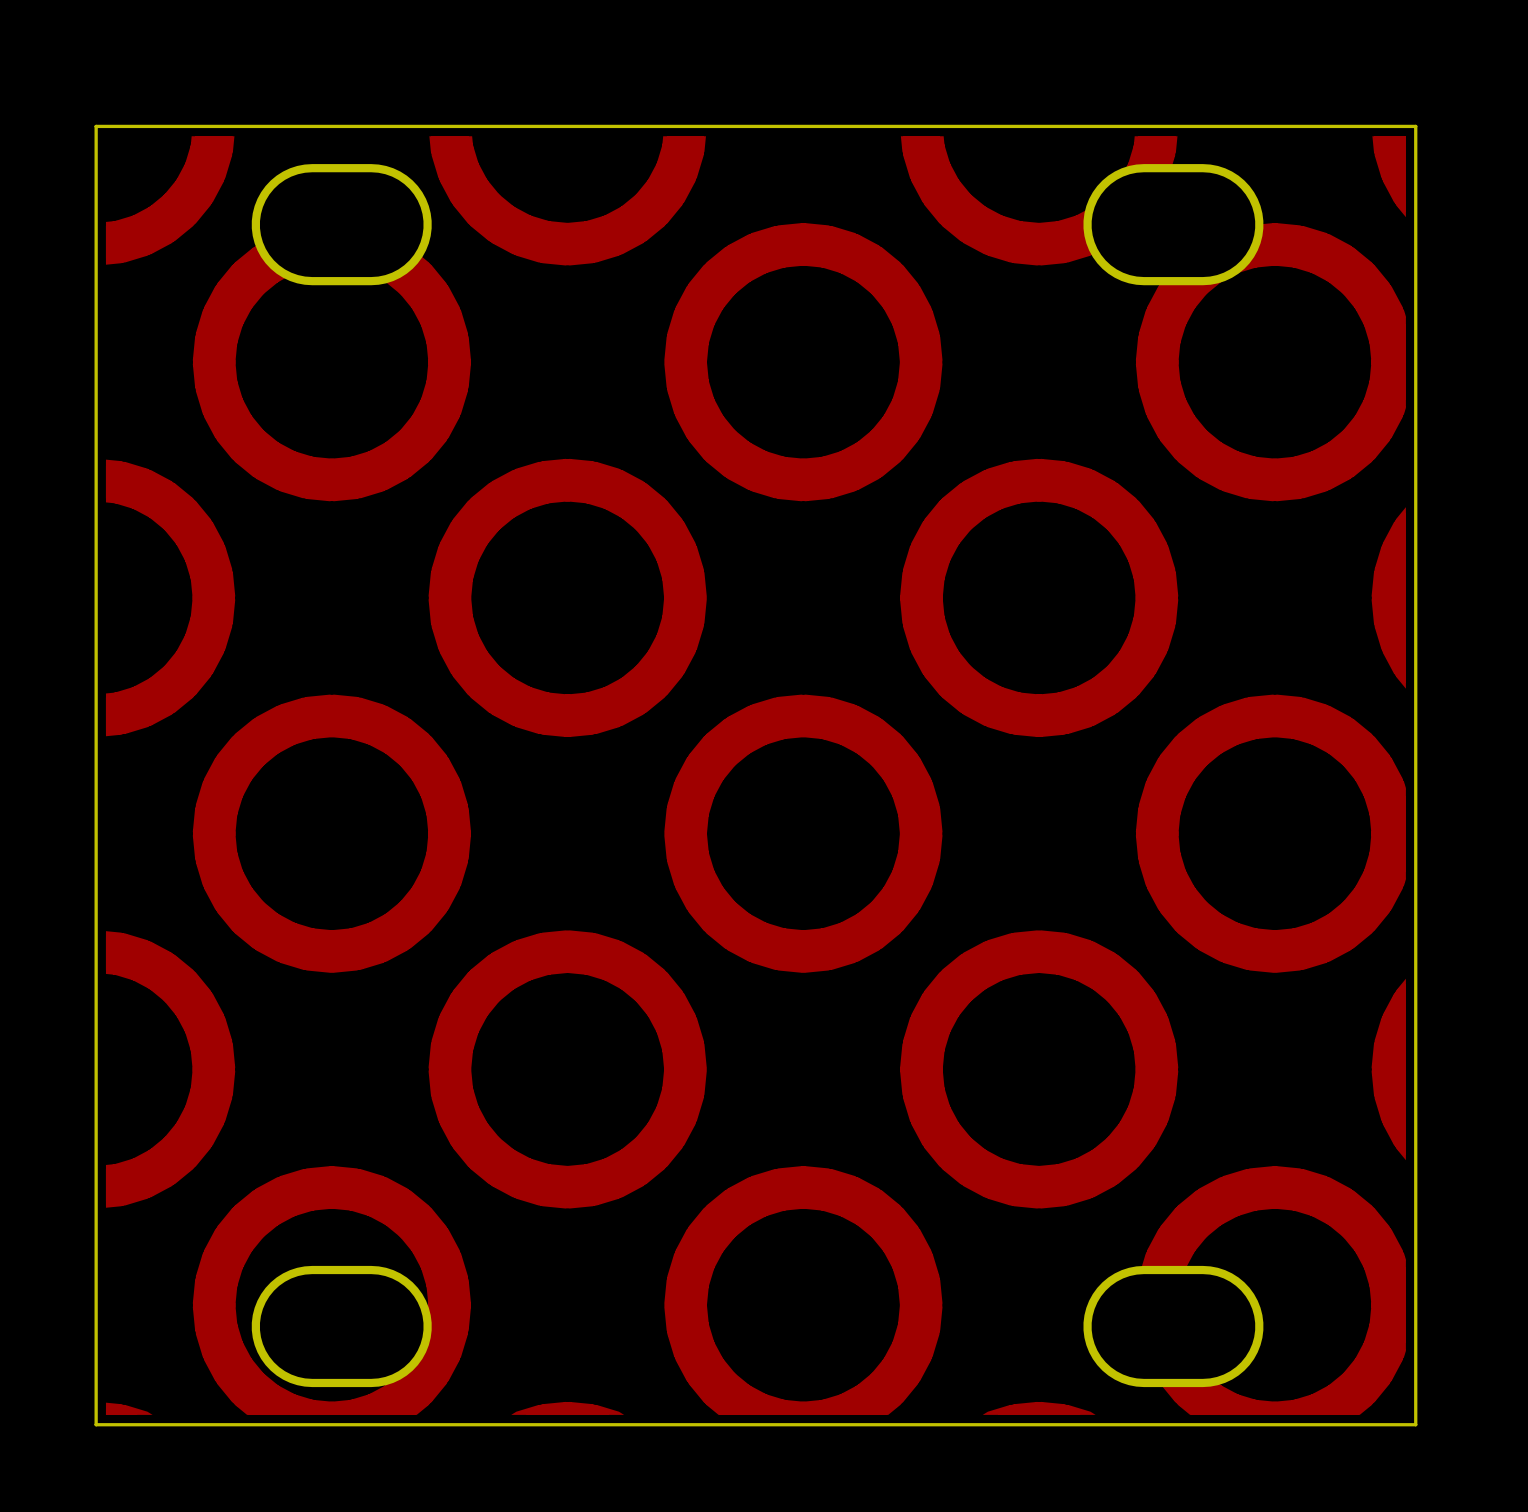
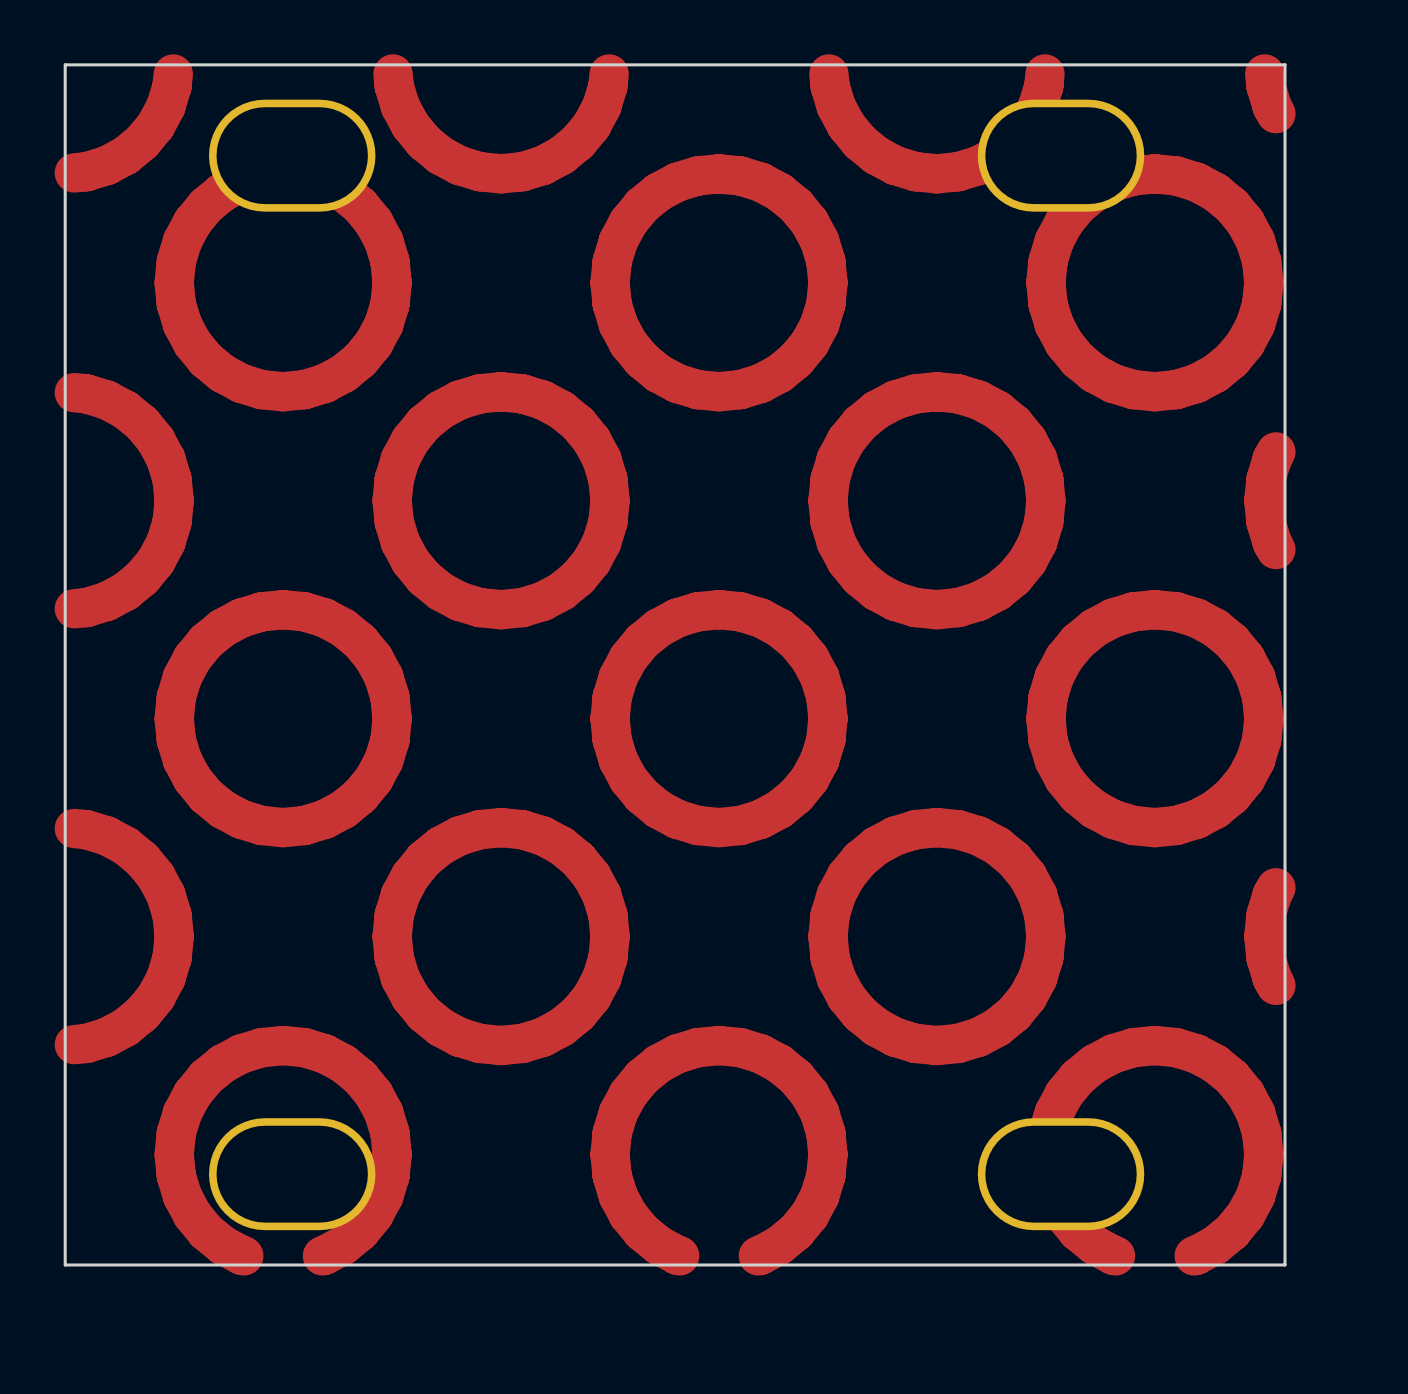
drawing: [105, 136, 1406, 1415] -> none
track: none -> (173, 73) (172, 86) (165, 106) (155, 125) (142, 141) (125, 155) (106, 165) (86, 171) (74, 172)
track: none -> (393, 73) (394, 86) (400, 106) (410, 125) (424, 141) (440, 155) (459, 165) (479, 171) (501, 173) (522, 171) (542, 165) (561, 155) (578, 141) (591, 125) (601, 106) (607, 86) (609, 73)
track: none -> (828, 73) (830, 86) (836, 106) (846, 125) (859, 141) (876, 155) (895, 165) (915, 171) (936, 173) (958, 171) (978, 165) (997, 155) (1013, 141) (1027, 125) (1037, 106) (1043, 86) (1045, 73)
track: none -> (1264, 73) (1265, 86) (1275, 113)
track: none -> (283, 173) (261, 175) (241, 182) (222, 192) (206, 205) (192, 222) (182, 241) (176, 261) (174, 282) (176, 304) (182, 324) (192, 343) (206, 359) (222, 373) (241, 383) (261, 389) (283, 391) (304, 389) (324, 383) (343, 373) (360, 359) (373, 343) (383, 324) (390, 304) (392, 282) (390, 261) (383, 241) (373, 222) (360, 205) (343, 192) (324, 182) (304, 175) (283, 173)
track: none -> (719, 173) (697, 175) (677, 182) (658, 192) (641, 205) (628, 222) (618, 241) (612, 261) (610, 282) (612, 304) (618, 324) (628, 343) (641, 359) (658, 373) (677, 383) (697, 389) (719, 391) (740, 389) (760, 383) (779, 373) (796, 359) (809, 343) (819, 324) (825, 304) (827, 282) (825, 261) (819, 241) (809, 222) (796, 205) (779, 192) (760, 182) (740, 175) (719, 173)
track: none -> (1154, 173) (1133, 175) (1113, 182) (1094, 192) (1077, 205) (1064, 222) (1054, 241) (1047, 261) (1045, 282) (1047, 304) (1054, 324) (1064, 343) (1077, 359) (1094, 373) (1113, 383) (1133, 389) (1154, 391) (1176, 389) (1196, 383) (1215, 373) (1231, 359) (1245, 343) (1255, 324) (1261, 304) (1263, 282) (1261, 261) (1255, 241) (1245, 222) (1231, 205) (1215, 192) (1196, 182) (1176, 175) (1154, 173)
track: none -> (501, 391) (479, 393) (459, 400) (440, 410) (424, 423) (410, 440) (400, 459) (394, 479) (392, 500) (394, 521) (400, 542) (410, 561) (424, 577) (440, 591) (459, 601) (479, 607) (501, 609) (522, 607) (542, 601) (561, 591) (578, 577) (591, 561) (601, 542) (607, 521) (610, 500) (607, 479) (601, 459) (591, 440) (578, 423) (561, 410) (542, 400) (522, 393) (501, 391)
track: none -> (936, 391) (915, 393) (895, 400) (876, 410) (859, 423) (846, 440) (836, 459) (830, 479) (827, 500) (830, 521) (836, 542) (846, 561) (859, 577) (876, 591) (895, 601) (915, 607) (936, 609) (958, 607) (978, 601) (997, 591) (1013, 577) (1027, 561) (1037, 542) (1043, 521) (1045, 500) (1043, 479) (1037, 459) (1027, 440) (1013, 423) (997, 410) (978, 400) (958, 393) (936, 391)
track: none -> (74, 392) (86, 393) (106, 400) (125, 410) (142, 423) (155, 440) (165, 459) (172, 479) (174, 500) (172, 521) (165, 542) (155, 561) (142, 577) (125, 591) (106, 601) (86, 607) (74, 608)
track: none -> (1275, 451) (1265, 479) (1263, 500) (1265, 521) (1275, 549)
track: none -> (283, 609) (261, 611) (241, 617) (222, 628) (206, 641) (192, 658) (182, 676) (176, 697) (174, 718) (176, 739) (182, 760) (192, 779) (206, 795) (222, 809) (241, 819) (261, 825) (283, 827) (304, 825) (324, 819) (343, 809) (360, 795) (373, 779) (383, 760) (390, 739) (392, 718) (390, 697) (383, 676) (373, 658) (360, 641) (343, 628) (324, 617) (304, 611) (283, 609)
track: none -> (719, 609) (697, 611) (677, 617) (658, 628) (641, 641) (628, 658) (618, 676) (612, 697) (610, 718) (612, 739) (618, 760) (628, 779) (641, 795) (658, 809) (677, 819) (697, 825) (719, 827) (740, 825) (760, 819) (779, 809) (796, 795) (809, 779) (819, 760) (825, 739) (827, 718) (825, 697) (819, 676) (809, 658) (796, 641) (779, 628) (760, 617) (740, 611) (719, 609)
track: none -> (1154, 609) (1133, 611) (1113, 617) (1094, 628) (1077, 641) (1064, 658) (1054, 676) (1047, 697) (1045, 718) (1047, 739) (1054, 760) (1064, 779) (1077, 795) (1094, 809) (1113, 819) (1133, 825) (1154, 827) (1176, 825) (1196, 819) (1215, 809) (1231, 795) (1245, 779) (1255, 760) (1261, 739) (1263, 718) (1261, 697) (1255, 676) (1245, 658) (1231, 641) (1215, 628) (1196, 617) (1176, 611) (1154, 609)
track: none -> (501, 827) (479, 829) (459, 835) (440, 845) (424, 859) (410, 876) (400, 894) (394, 915) (392, 936) (394, 957) (400, 978) (410, 997) (424, 1013) (440, 1027) (459, 1037) (479, 1043) (501, 1045) (522, 1043) (542, 1037) (561, 1027) (578, 1013) (591, 997) (601, 978) (607, 957) (610, 936) (607, 915) (601, 894) (591, 876) (578, 859) (561, 845) (542, 835) (522, 829) (501, 827)
track: none -> (936, 827) (915, 829) (895, 835) (876, 845) (859, 859) (846, 876) (836, 894) (830, 915) (827, 936) (830, 957) (836, 978) (846, 997) (859, 1013) (876, 1027) (895, 1037) (915, 1043) (936, 1045) (958, 1043) (978, 1037) (997, 1027) (1013, 1013) (1027, 997) (1037, 978) (1043, 957) (1045, 936) (1043, 915) (1037, 894) (1027, 876) (1013, 859) (997, 845) (978, 835) (958, 829) (936, 827)
track: none -> (74, 828) (86, 829) (106, 835) (125, 845) (142, 859) (155, 876) (165, 894) (172, 915) (174, 936) (172, 957) (165, 978) (155, 997) (142, 1013) (125, 1027) (106, 1037) (86, 1043) (74, 1044)
track: none -> (1275, 887) (1265, 915) (1263, 936) (1265, 957) (1275, 985)
drawing: [511, 1401, 625, 1415] -> none
drawing: [982, 1401, 1096, 1415] -> none
drawing: [105, 1402, 153, 1415] -> none
track: none -> (243, 1255) (222, 1245) (206, 1231) (192, 1215) (182, 1196) (176, 1175) (174, 1154) (176, 1133) (182, 1112) (192, 1093) (206, 1077) (222, 1063) (241, 1053) (261, 1047) (283, 1045) (304, 1047) (324, 1053) (343, 1063) (360, 1077) (373, 1093) (383, 1112) (390, 1133) (392, 1154) (390, 1175) (383, 1196) (373, 1215) (360, 1231) (343, 1245) (322, 1255)
track: none -> (679, 1255) (658, 1245) (641, 1231) (628, 1215) (618, 1196) (612, 1175) (610, 1154) (612, 1133) (618, 1112) (628, 1093) (641, 1077) (658, 1063) (677, 1053) (697, 1047) (719, 1045) (740, 1047) (760, 1053) (779, 1063) (796, 1077) (809, 1093) (819, 1112) (825, 1133) (827, 1154) (825, 1175) (819, 1196) (809, 1215) (796, 1231) (779, 1245) (758, 1255)
track: none -> (1115, 1255) (1094, 1245) (1077, 1231) (1064, 1215) (1054, 1196) (1047, 1175) (1045, 1154) (1047, 1133) (1054, 1112) (1064, 1093) (1077, 1077) (1094, 1063) (1113, 1053) (1133, 1047) (1154, 1045) (1176, 1047) (1196, 1053) (1215, 1063) (1231, 1077) (1245, 1093) (1255, 1112) (1261, 1133) (1263, 1154) (1261, 1175) (1255, 1196) (1245, 1215) (1231, 1231) (1215, 1245) (1194, 1255)

